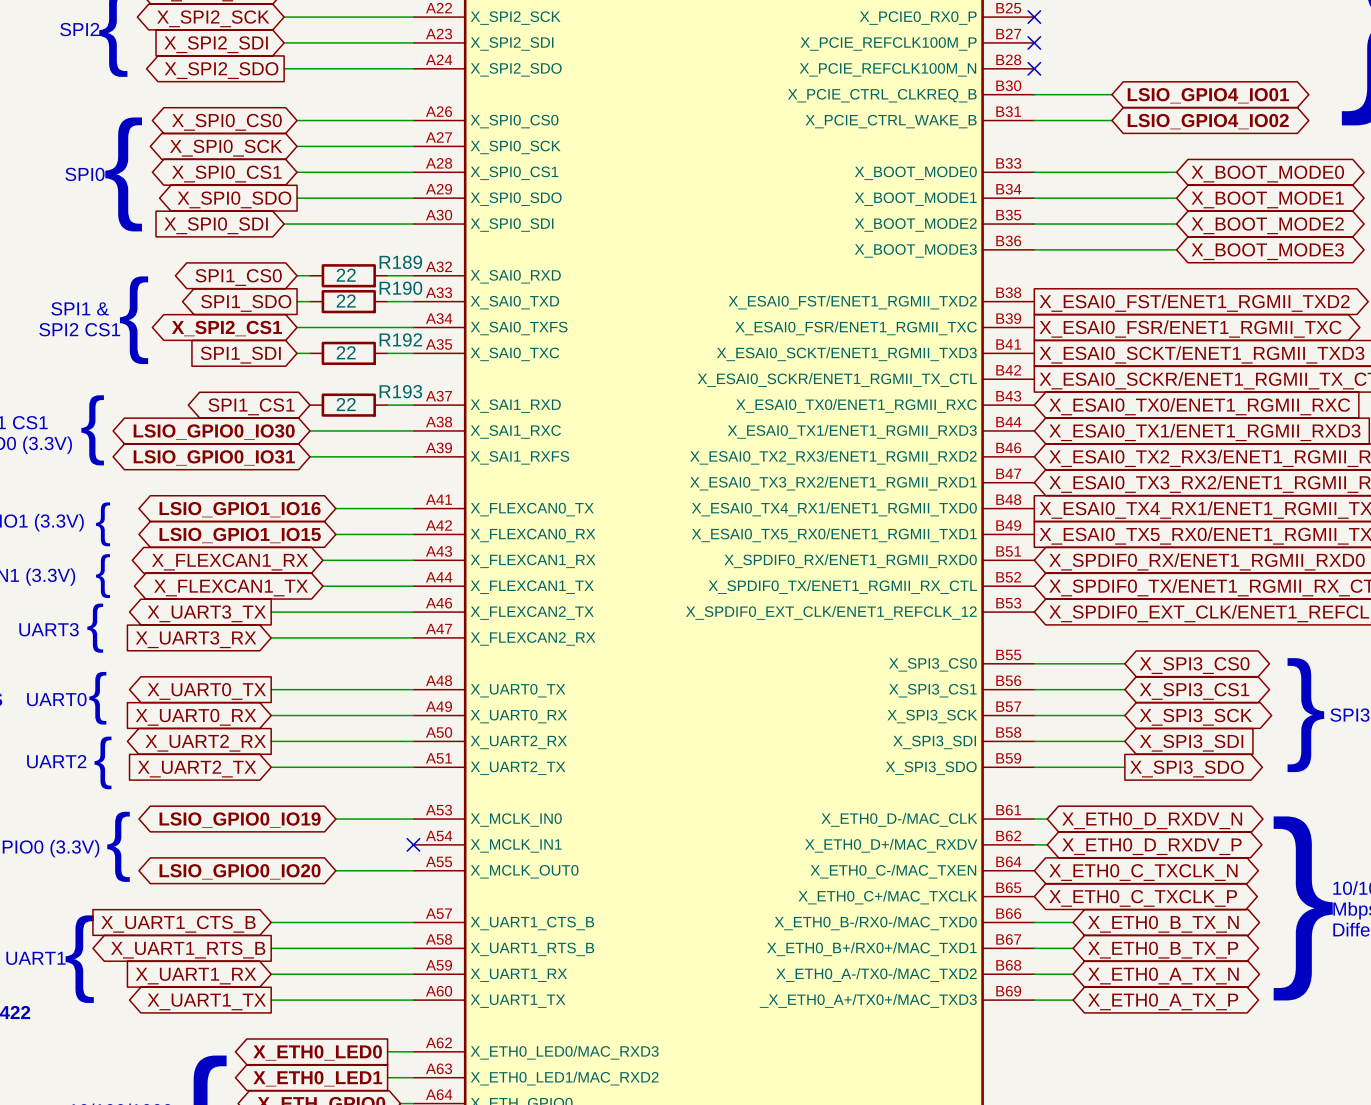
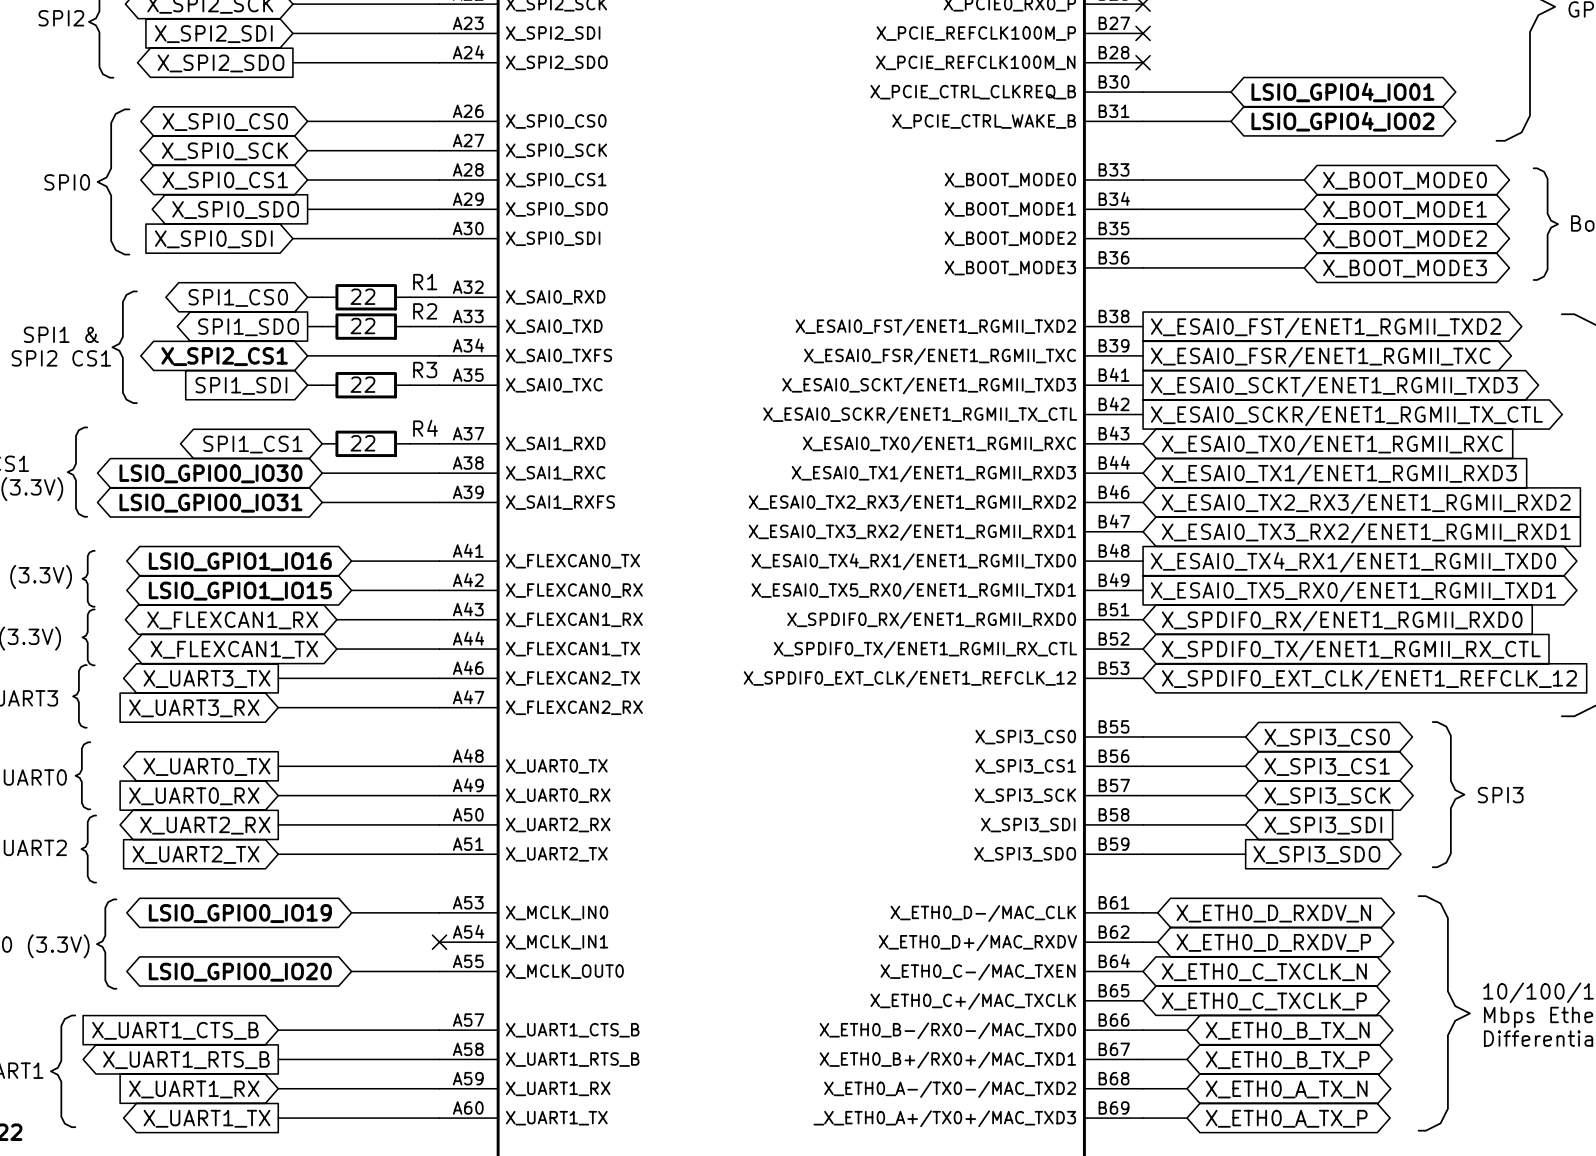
R189 name: R189 (400, 262) -> R1 (425, 282)
R190 name: R190 (400, 288) -> R2 (425, 311)
R192 name: R192 (400, 339) -> R3 (425, 370)
R193 name: R193 (400, 391) -> R4 (425, 428)

